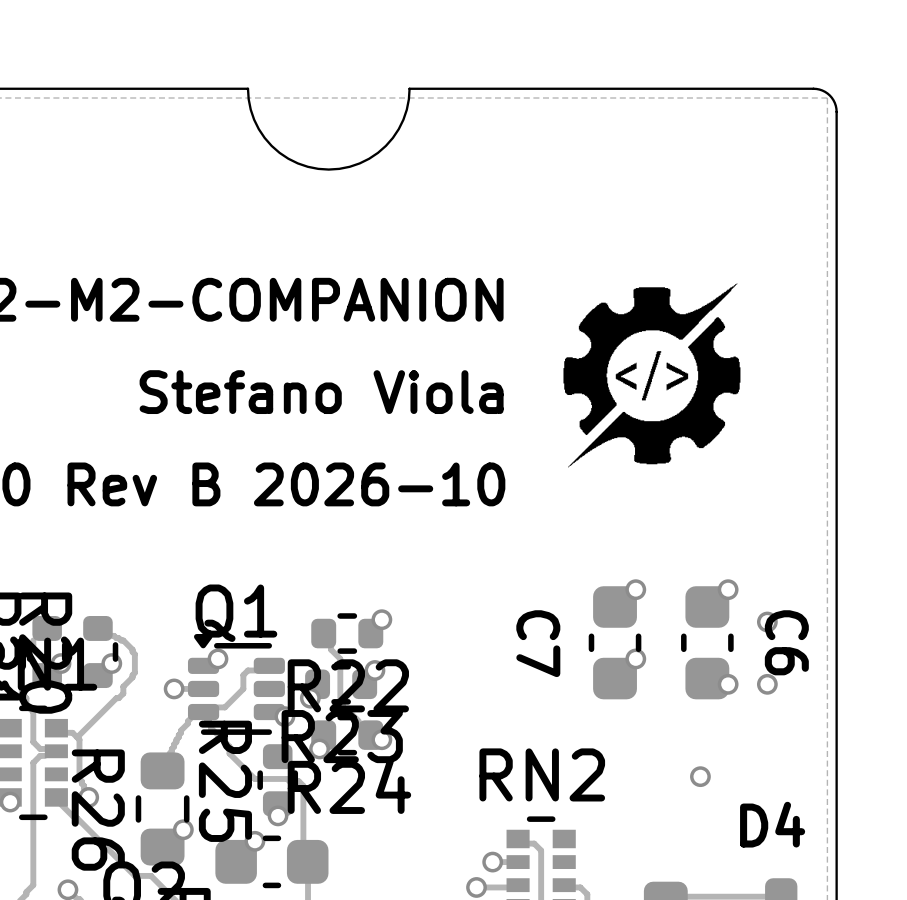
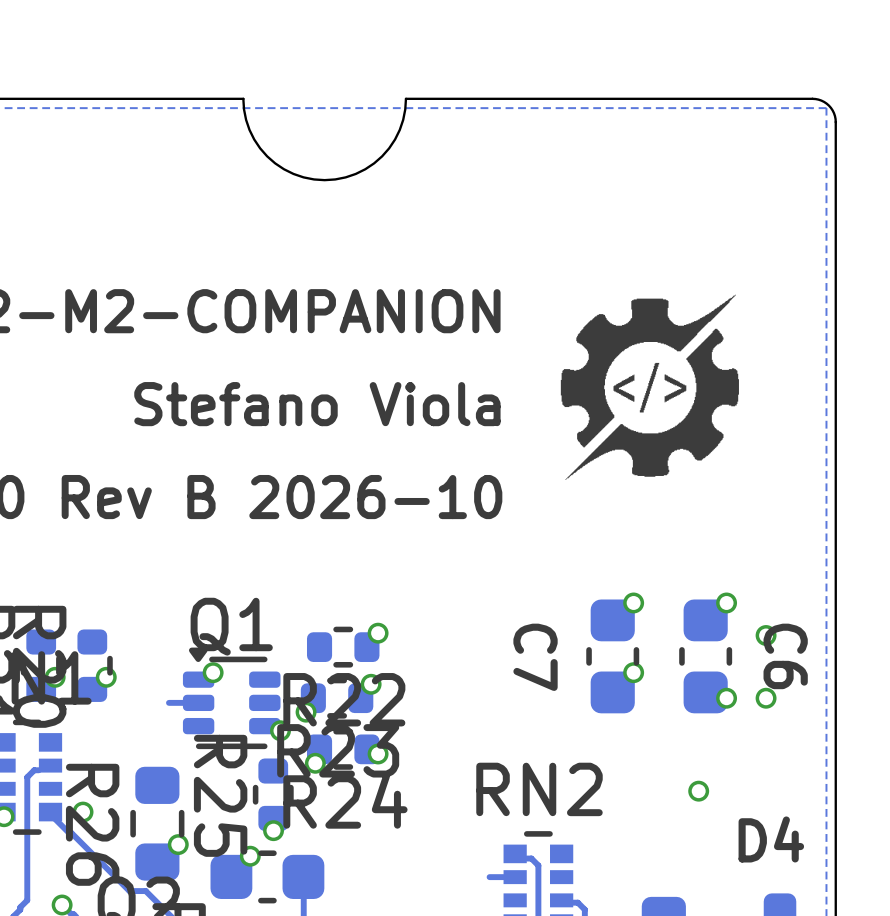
track: (111, 635) (123, 640) (132, 649) (134, 654) (134, 672) (123, 686) (123, 693) (77, 737) -> none
track: (33, 640) (33, 645) (21, 656) (21, 693) (26, 698) (26, 705) (33, 712) (33, 742) (40, 748) (44, 748) -> none
track: (331, 647) (340, 658) (340, 702) (344, 709) (358, 721) -> none
track: (254, 670) (247, 670) (243, 675) (243, 688) (224, 707) (217, 707) -> none
via: (174, 688) -> none
track: (190, 718) (181, 730) (169, 753) -> none
track: (206, 718) (211, 728) (229, 746) (229, 753) (254, 778) (287, 778) (289, 781) (298, 781) (303, 785) (303, 841) -> none
track: (67, 732) (72, 732) (79, 739) (79, 778) (88, 797) -> none
via: (492, 862) -> none
via: (476, 887) -> none
track: (506, 887) (476, 887) -> none
track: (767, 896) (686, 896) -> none

